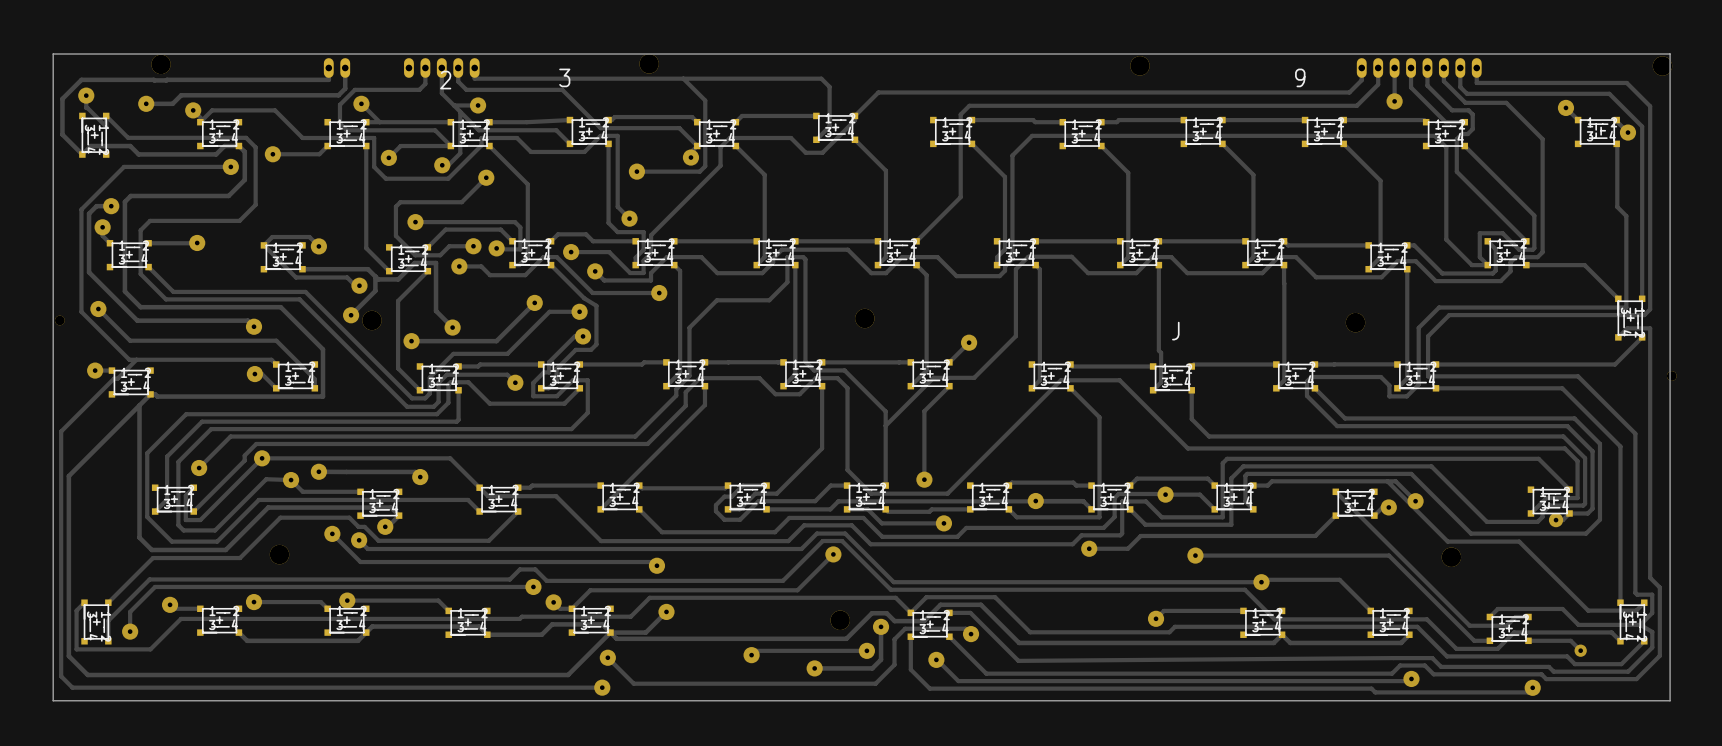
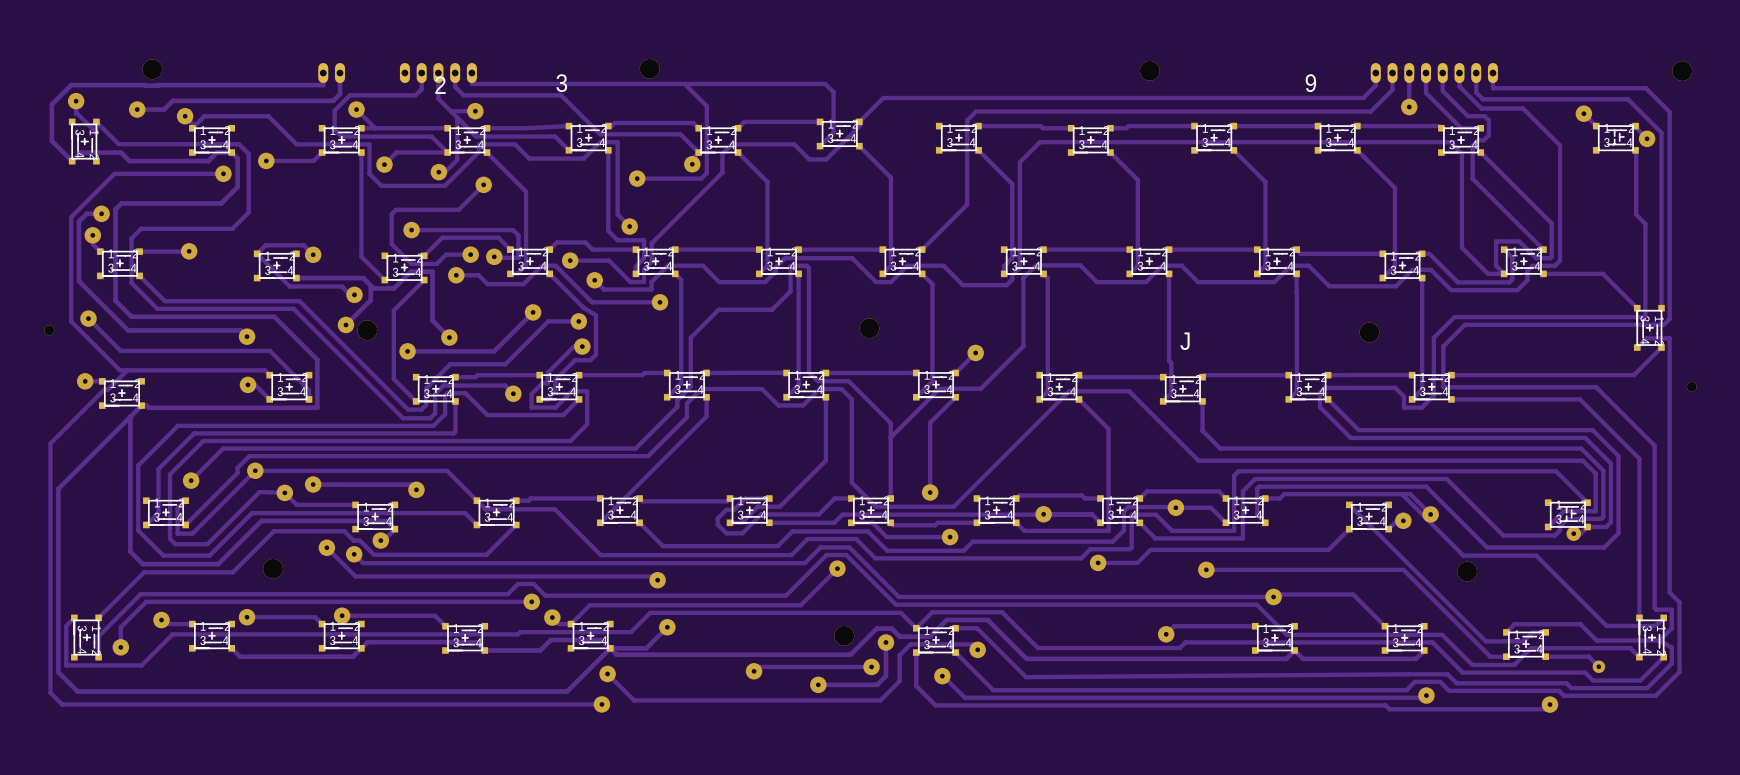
board edge: (1670, 54) (53, 54) (53, 700) (1670, 700) (1670, 54) -> none

